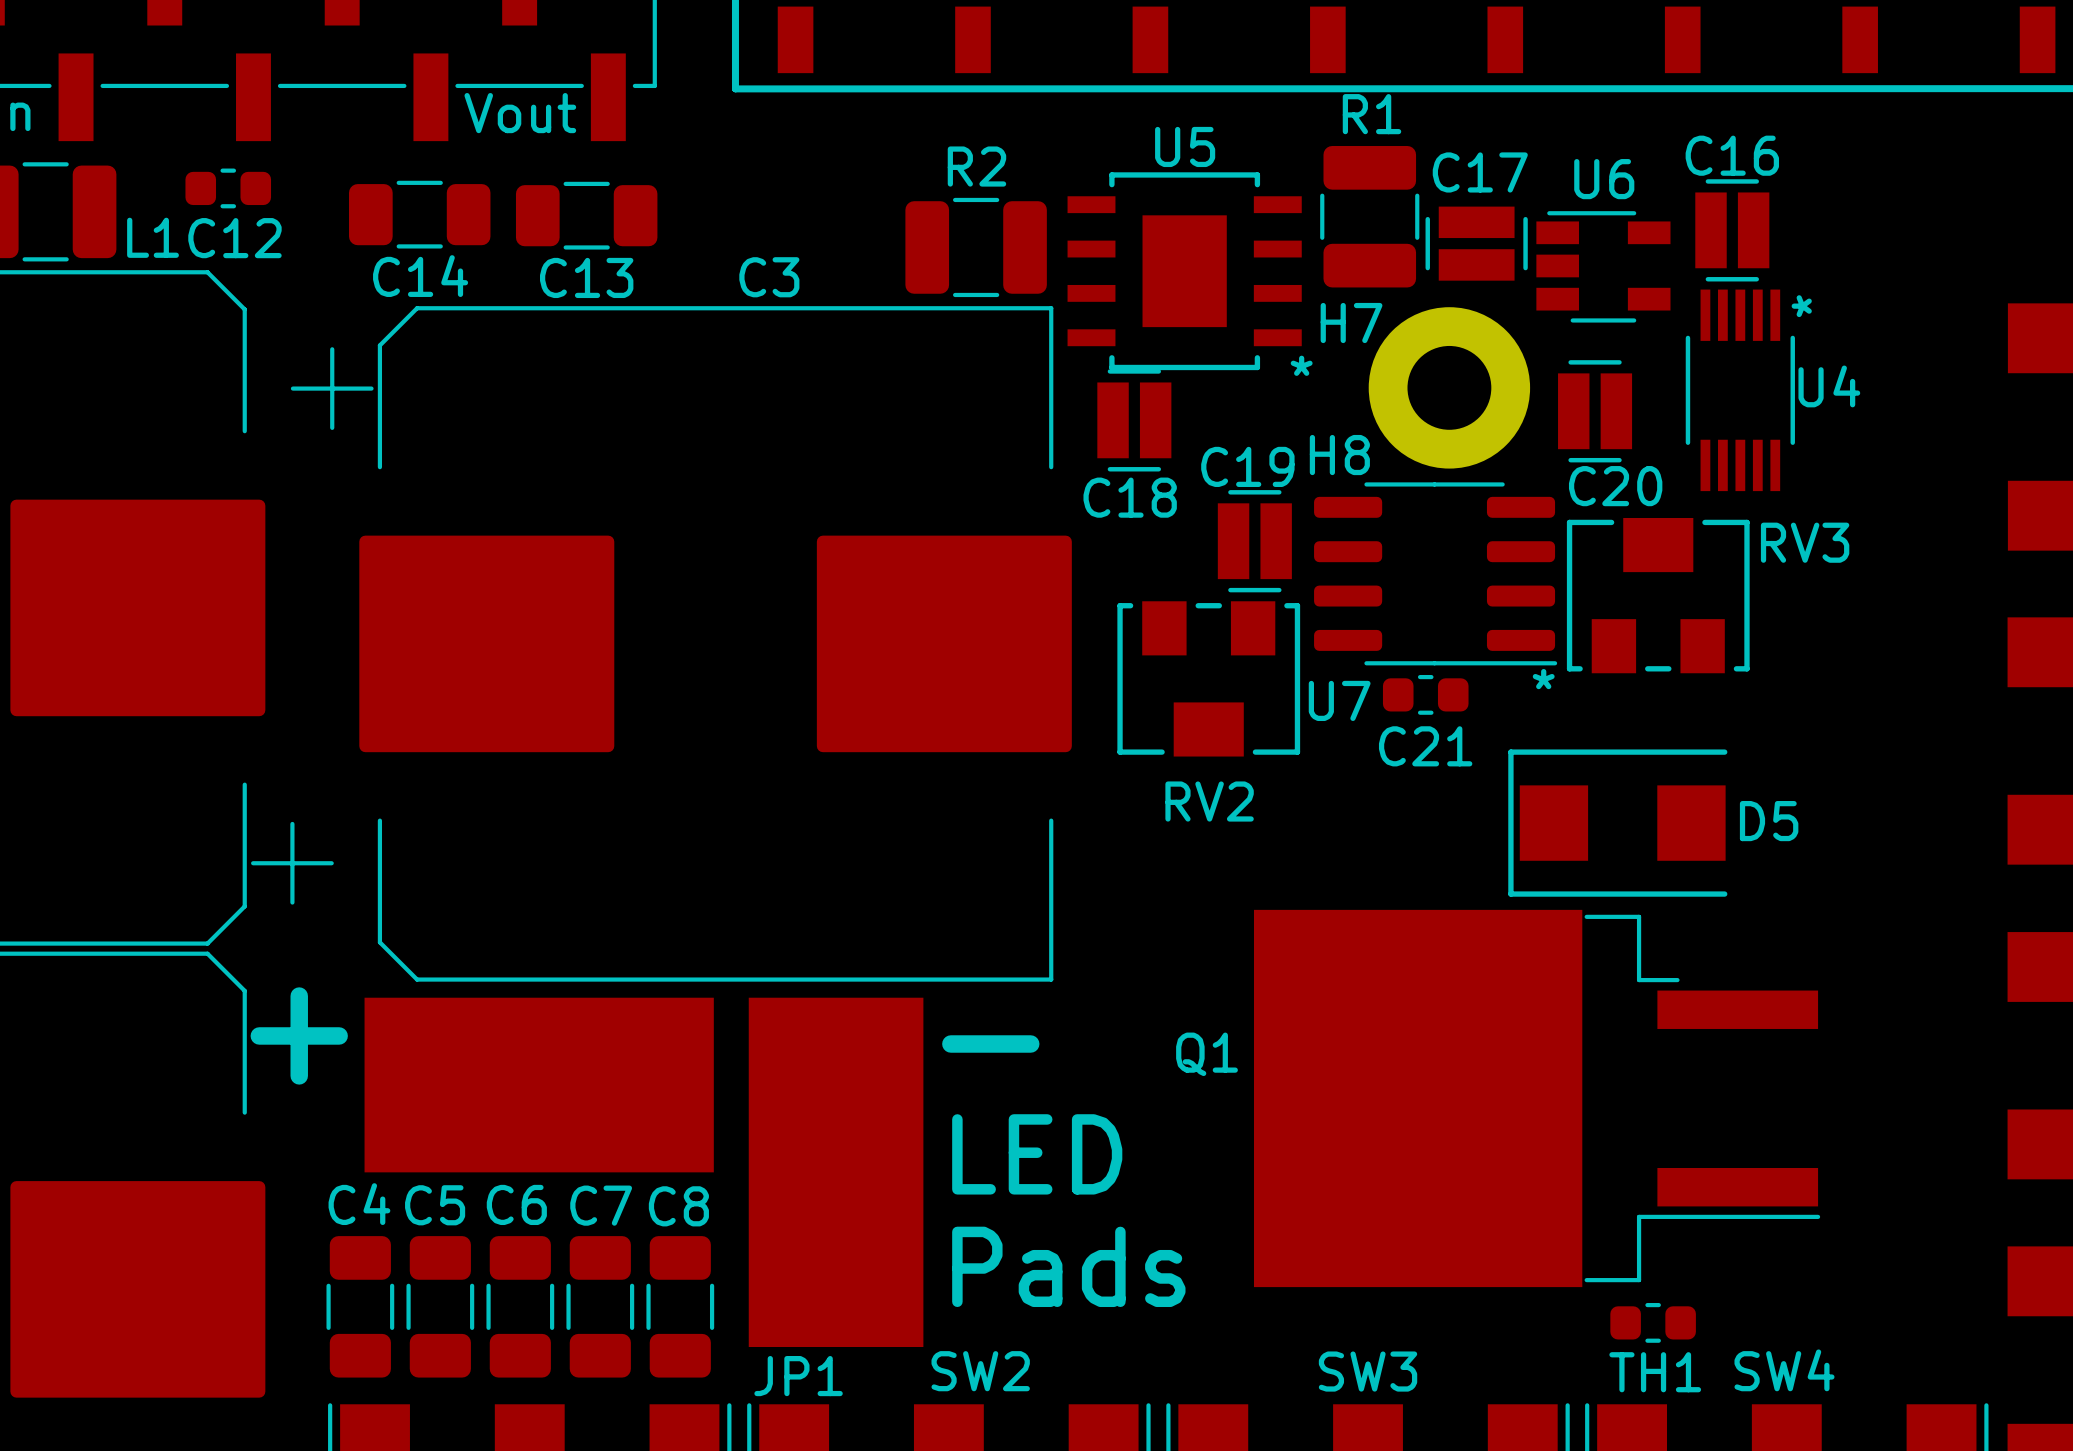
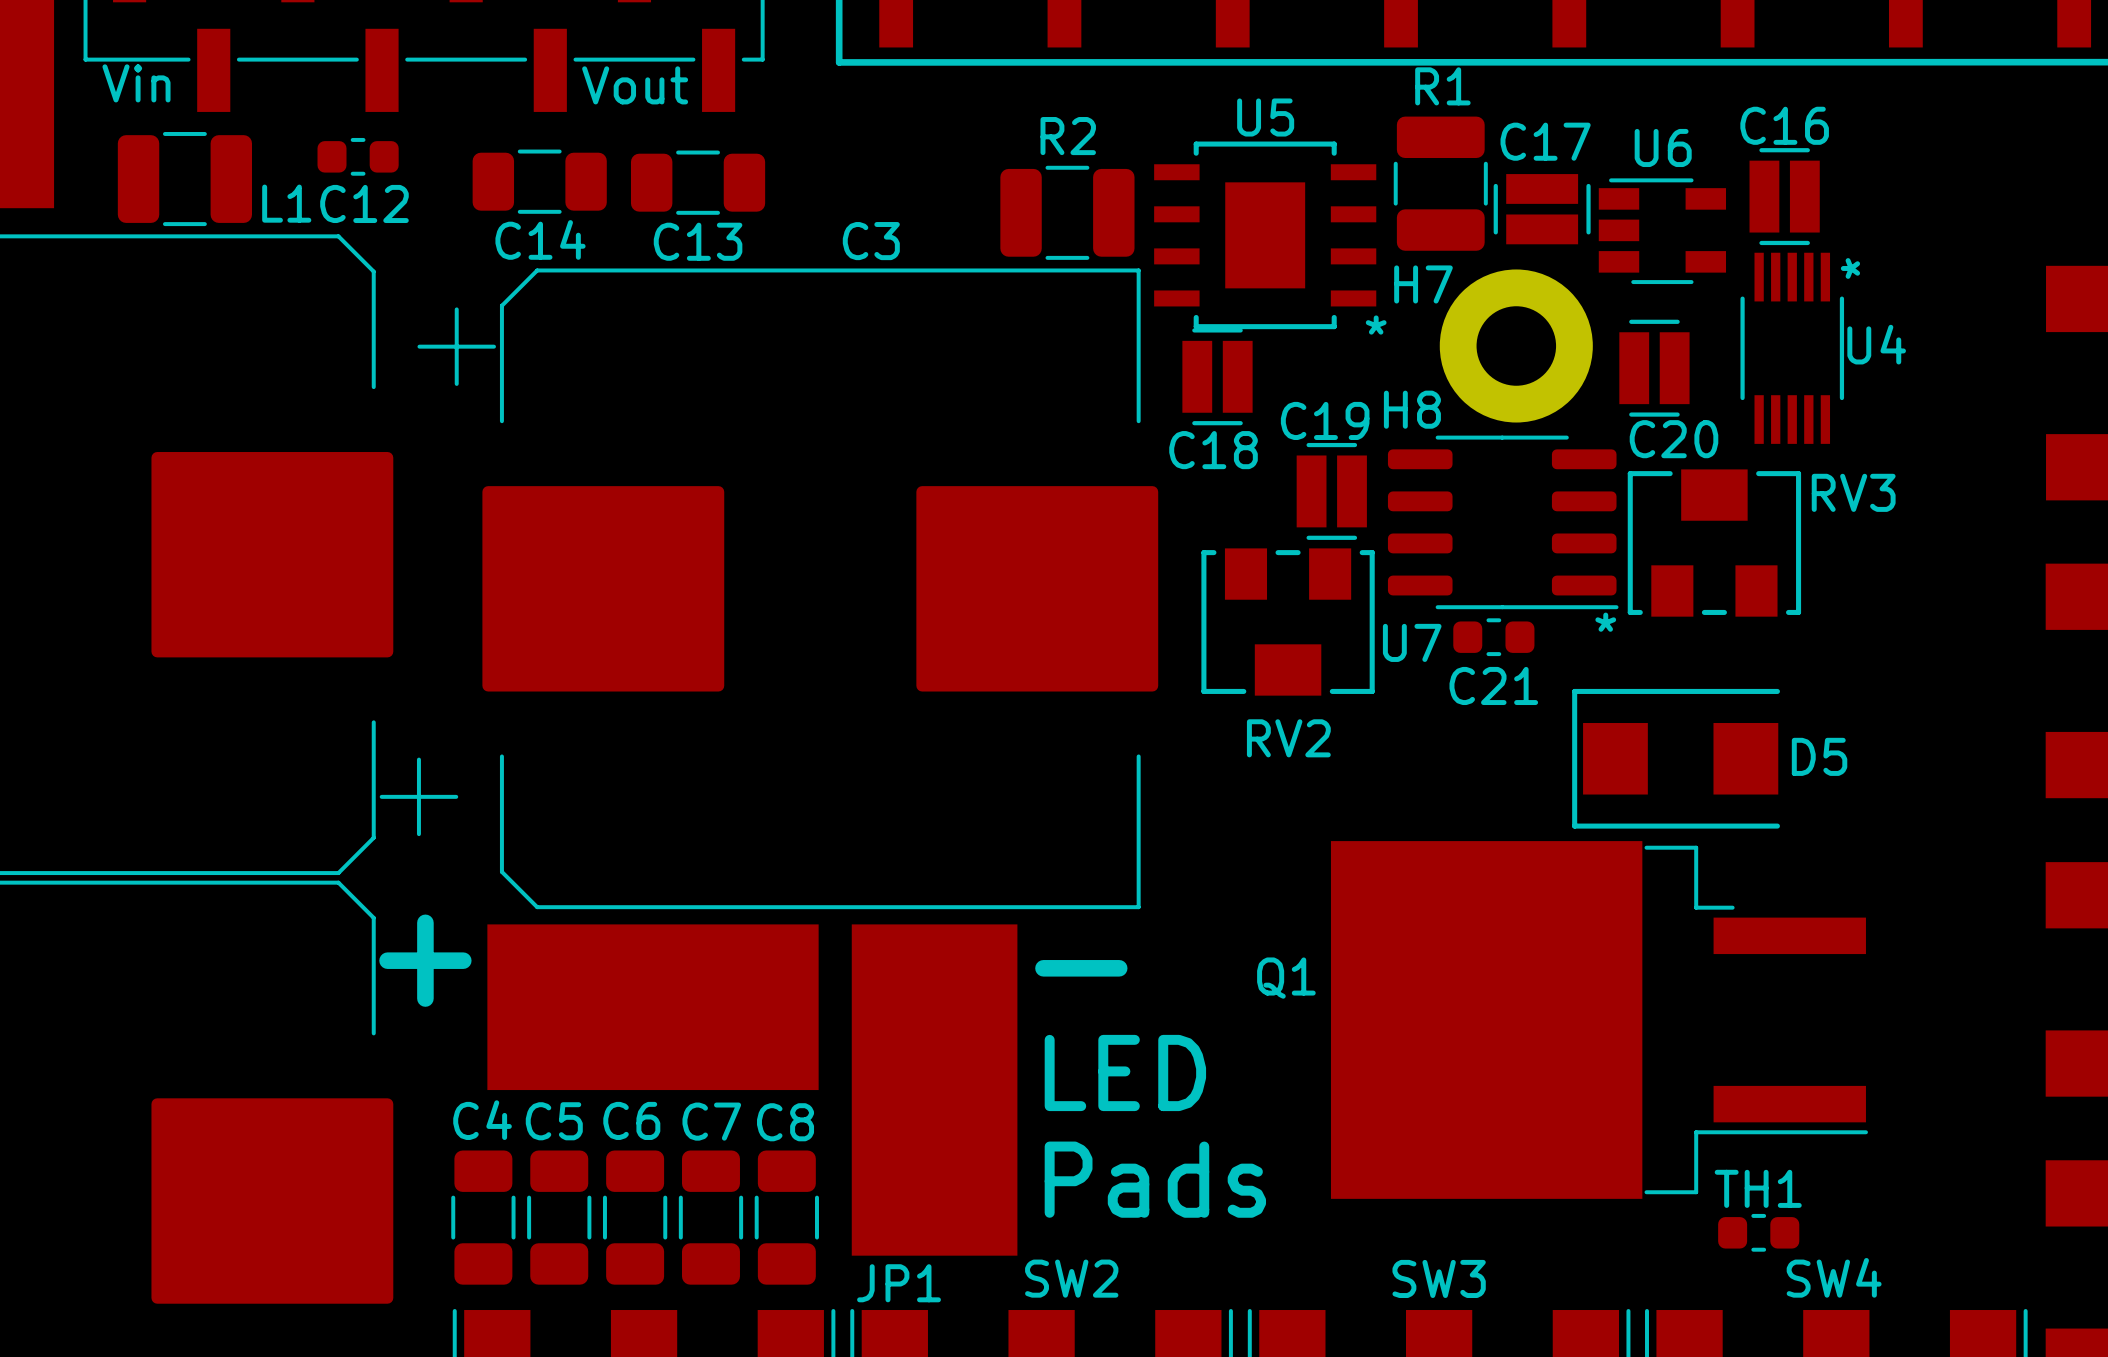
TH1 position: (1653, 1322) -> (1758, 1232)
TH1 name position: TH1 (1655, 1372) -> TH1 (1758, 1188)

